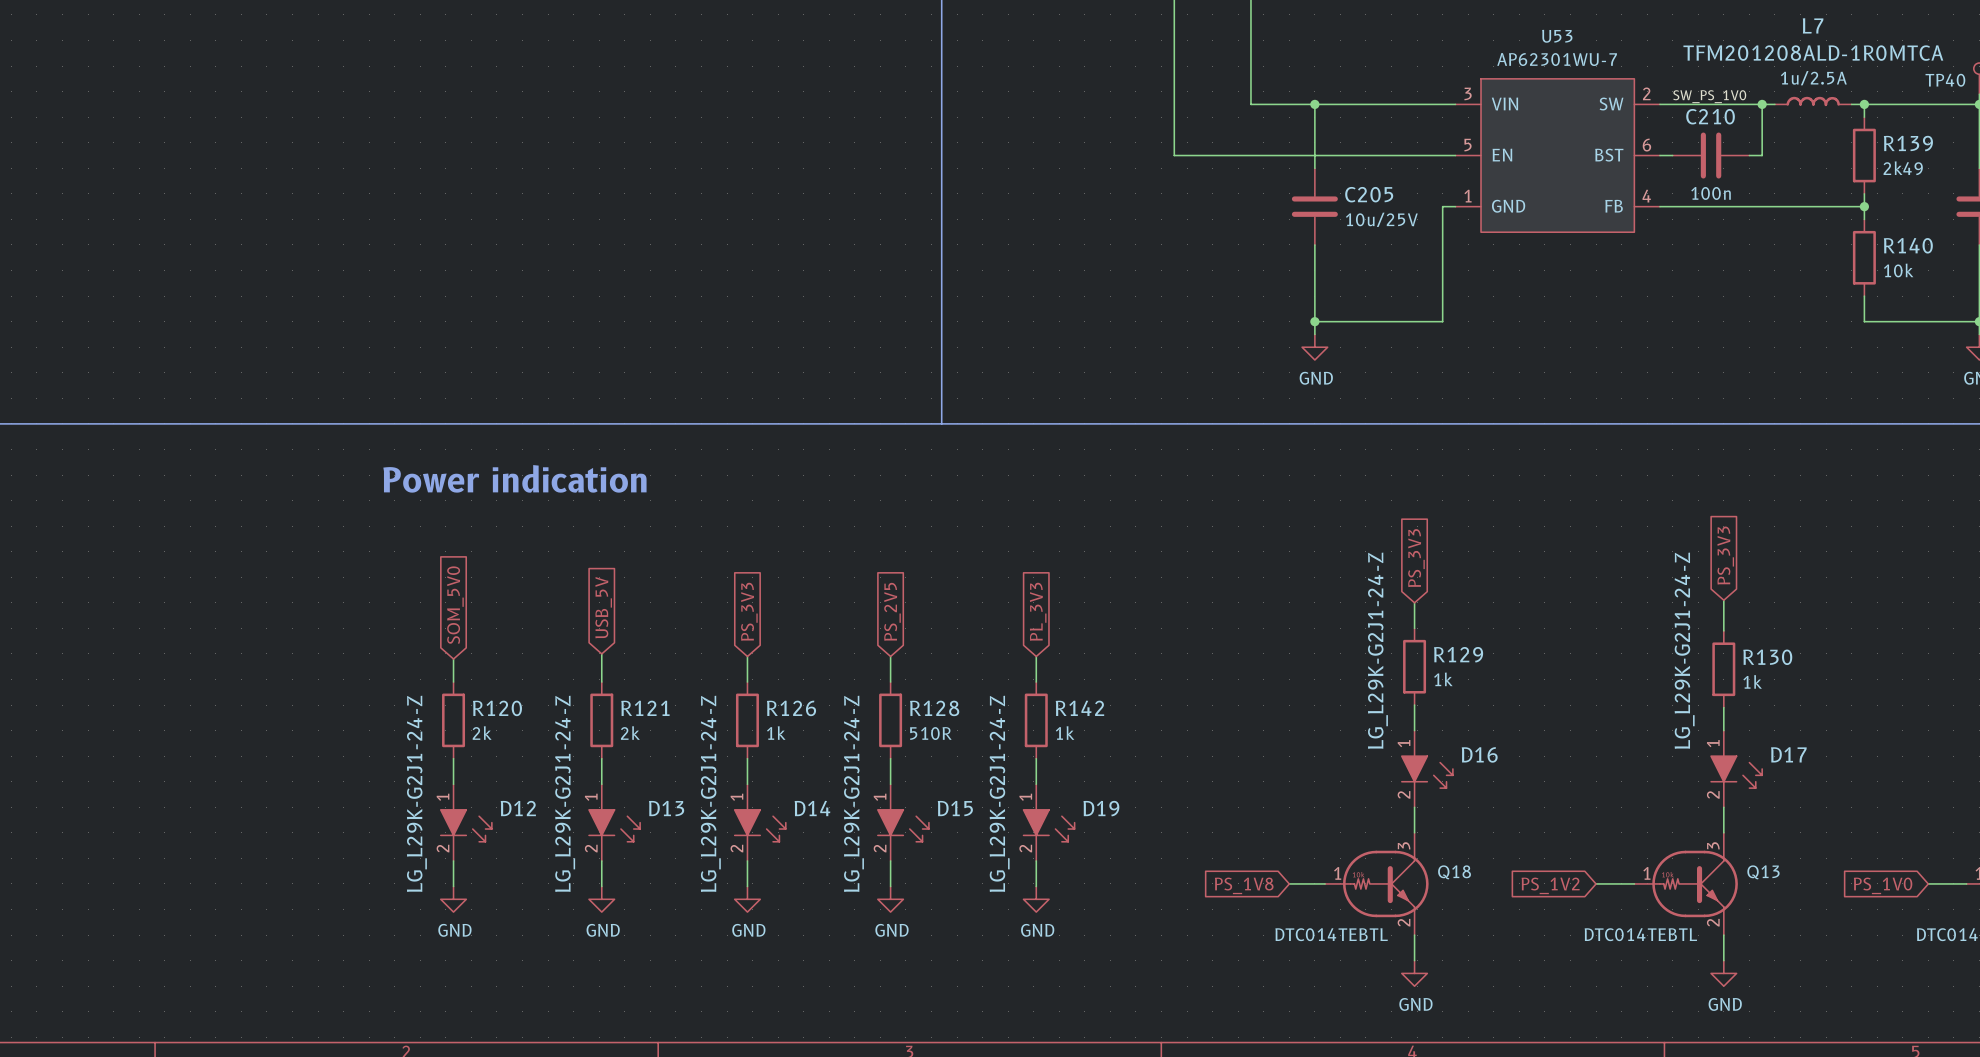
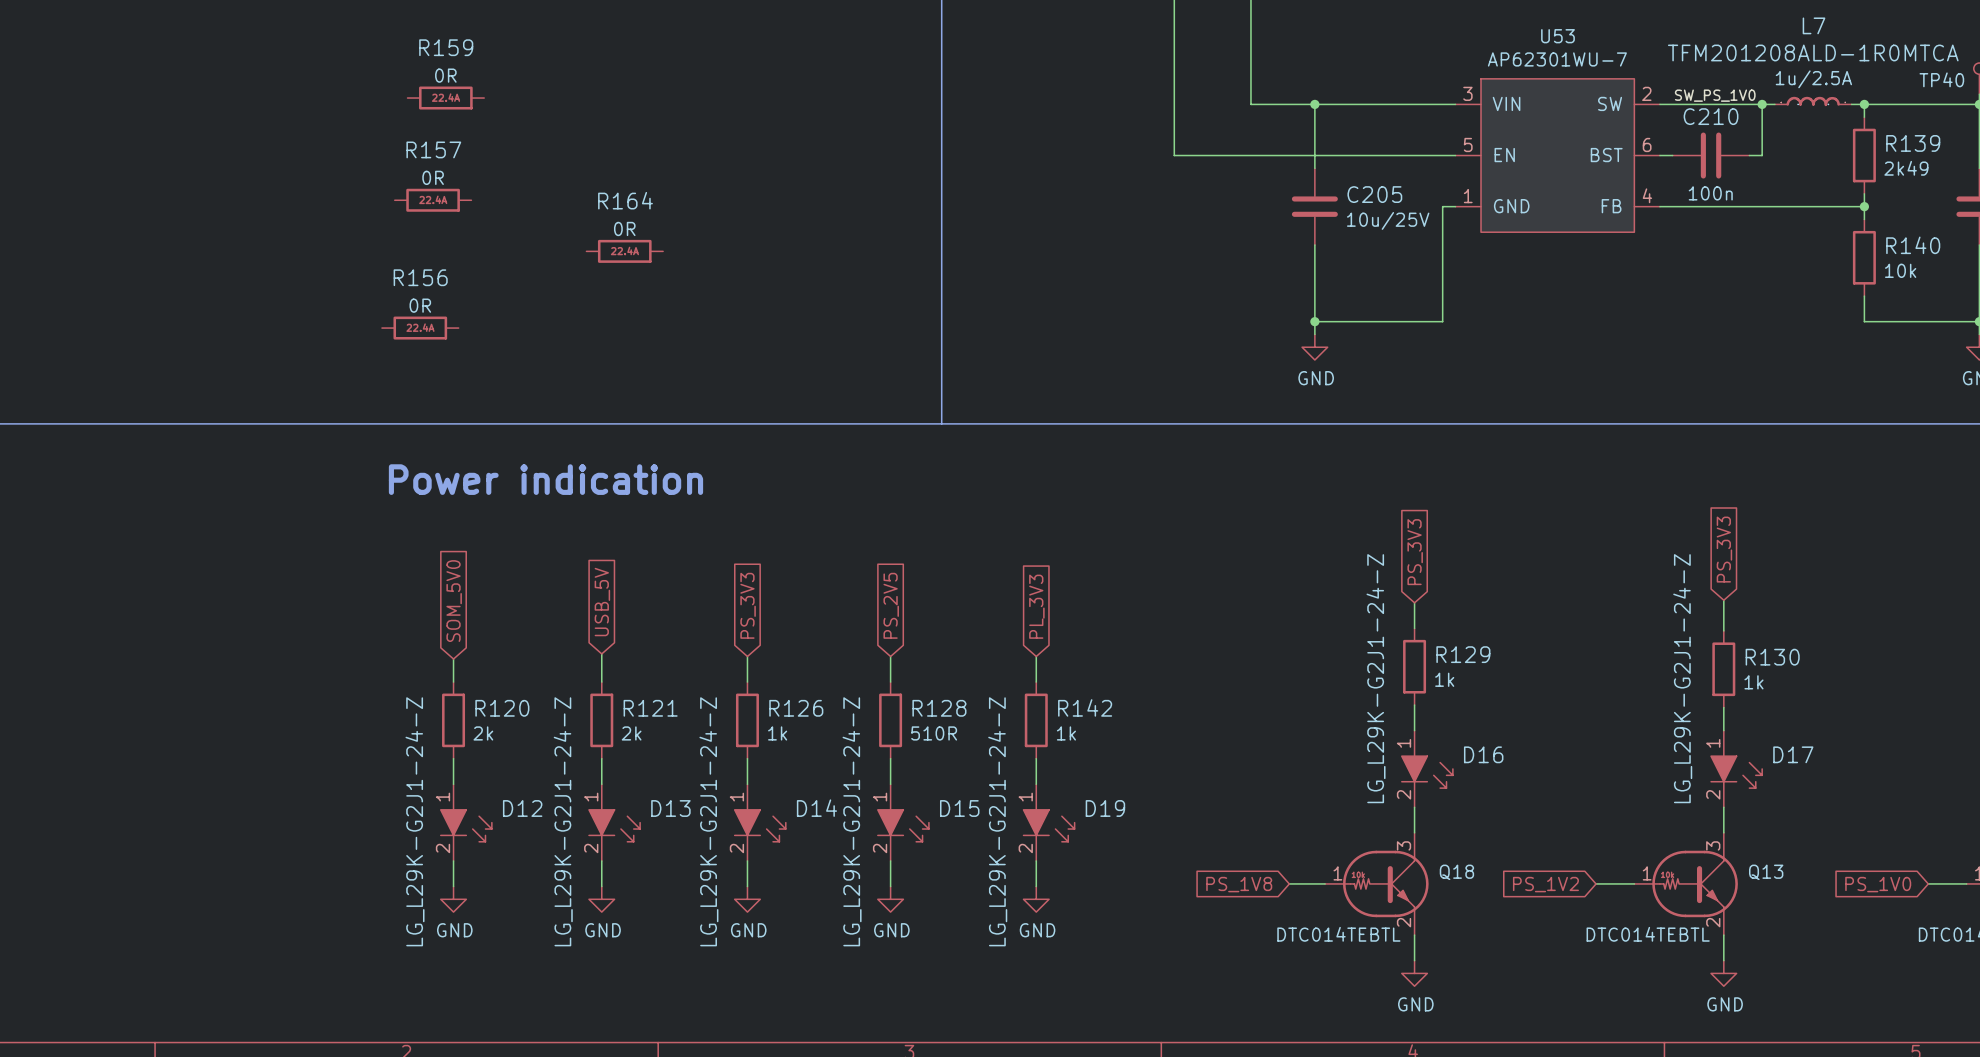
R159: none -> (445, 98)
R157: none -> (433, 200)
R164: none -> (624, 251)
R156: none -> (420, 328)

